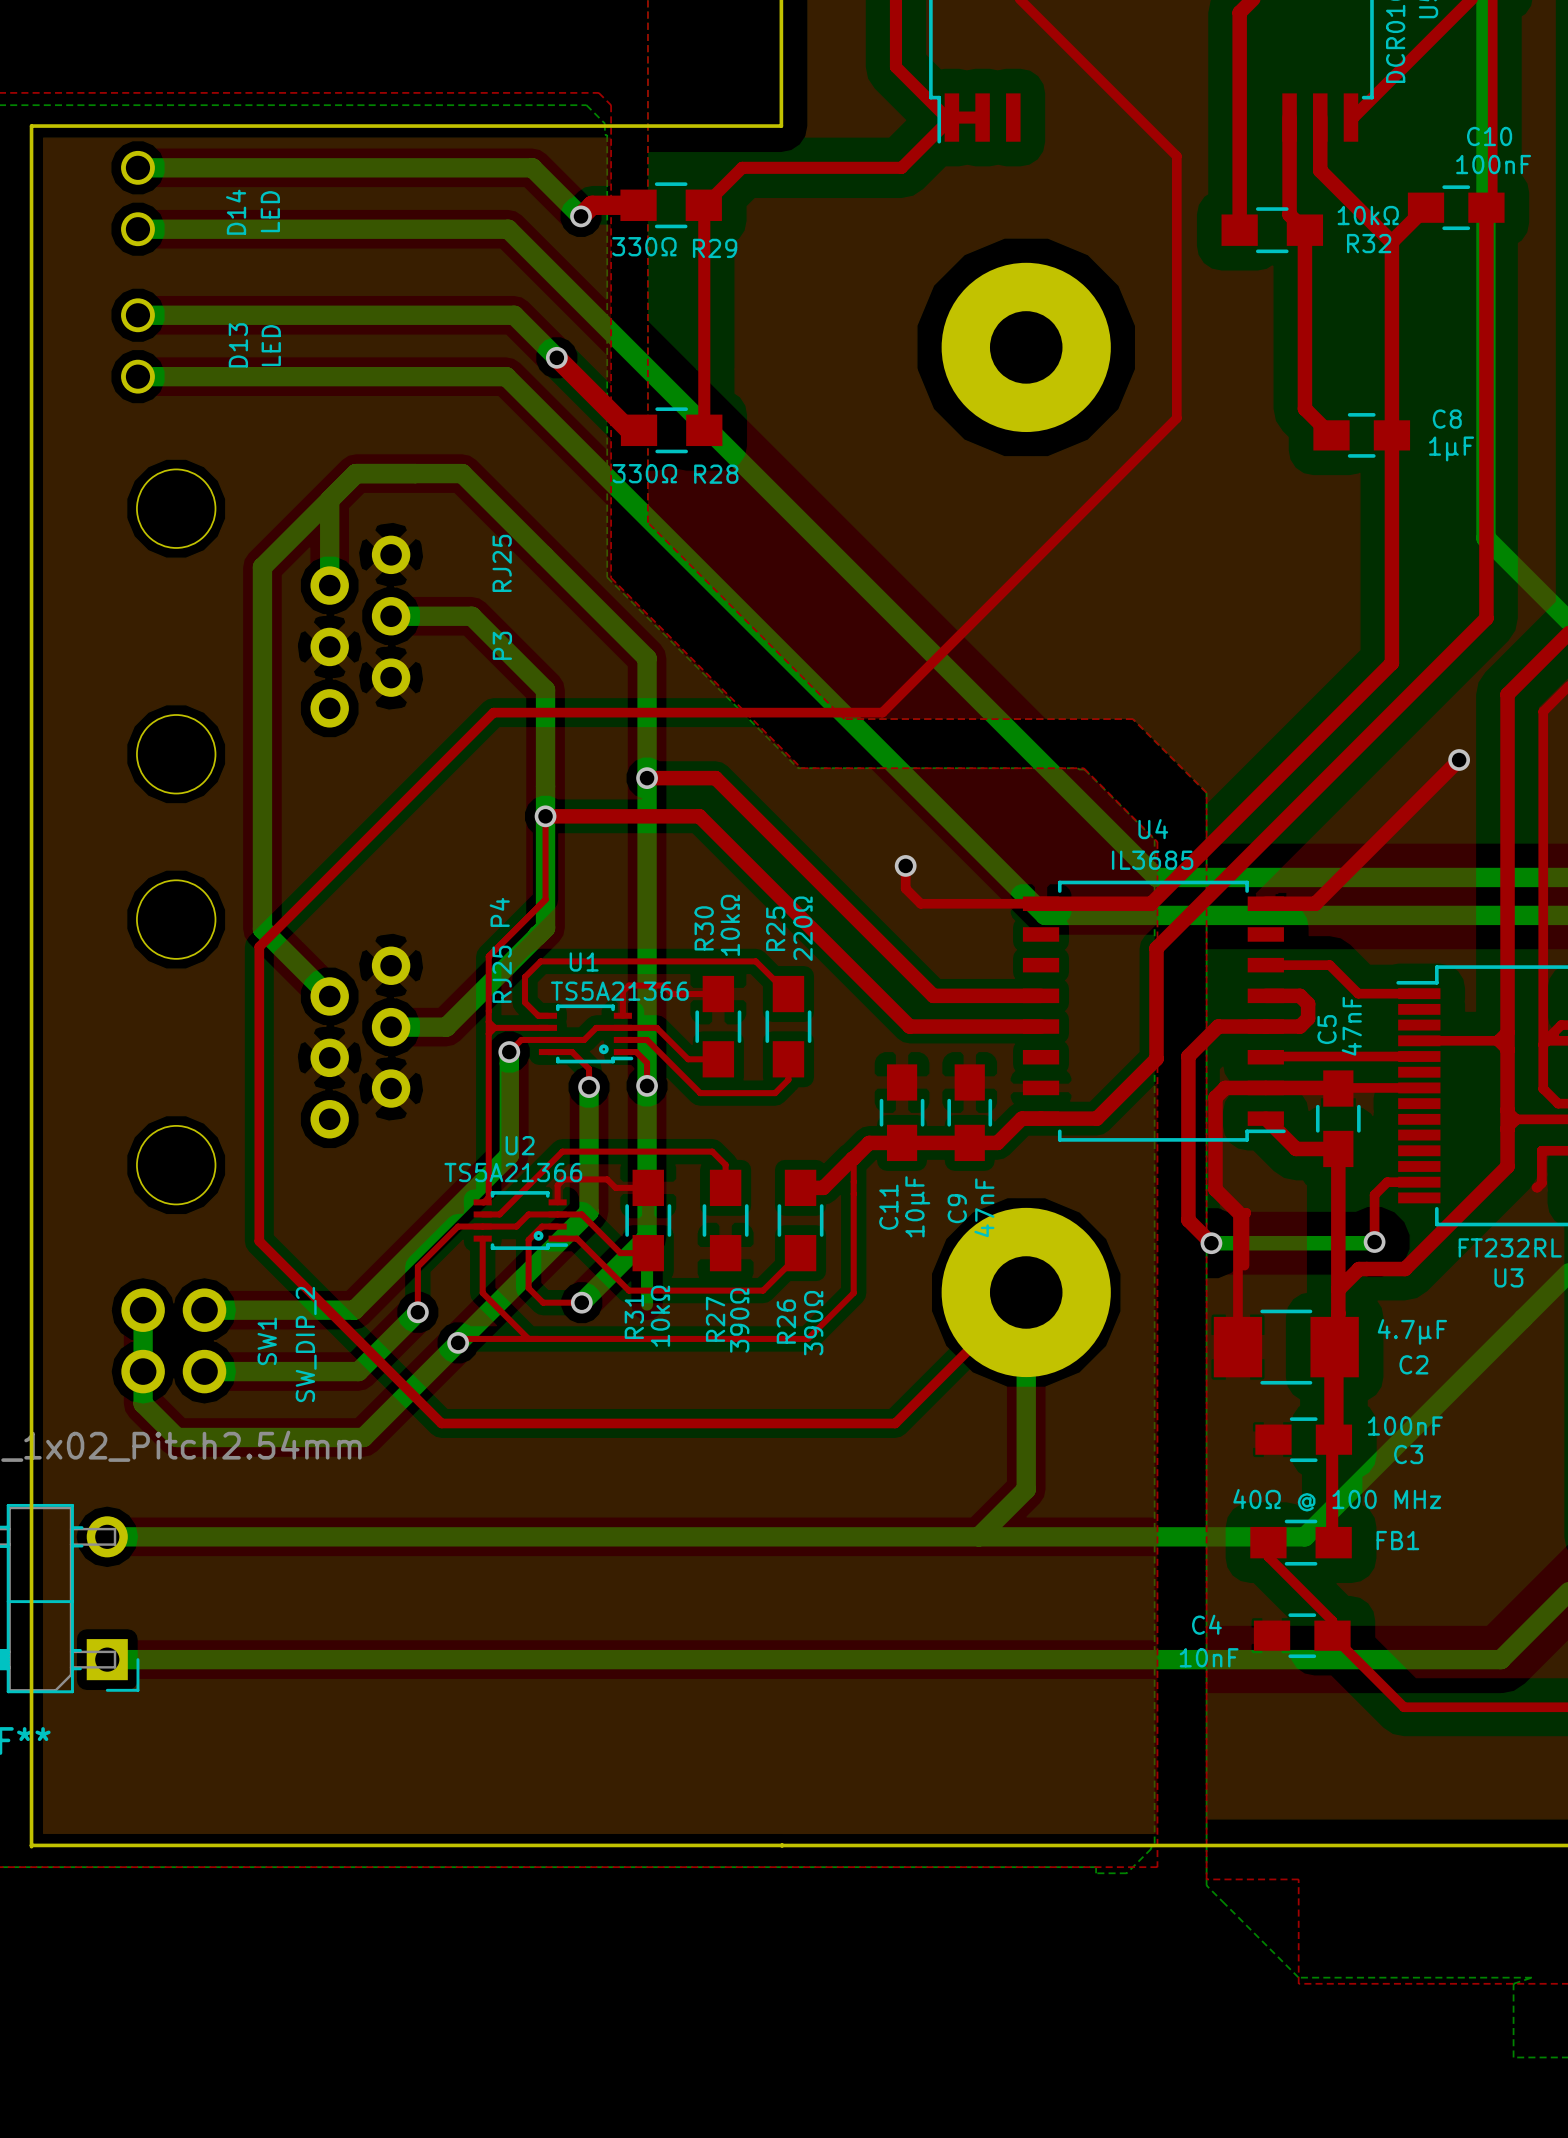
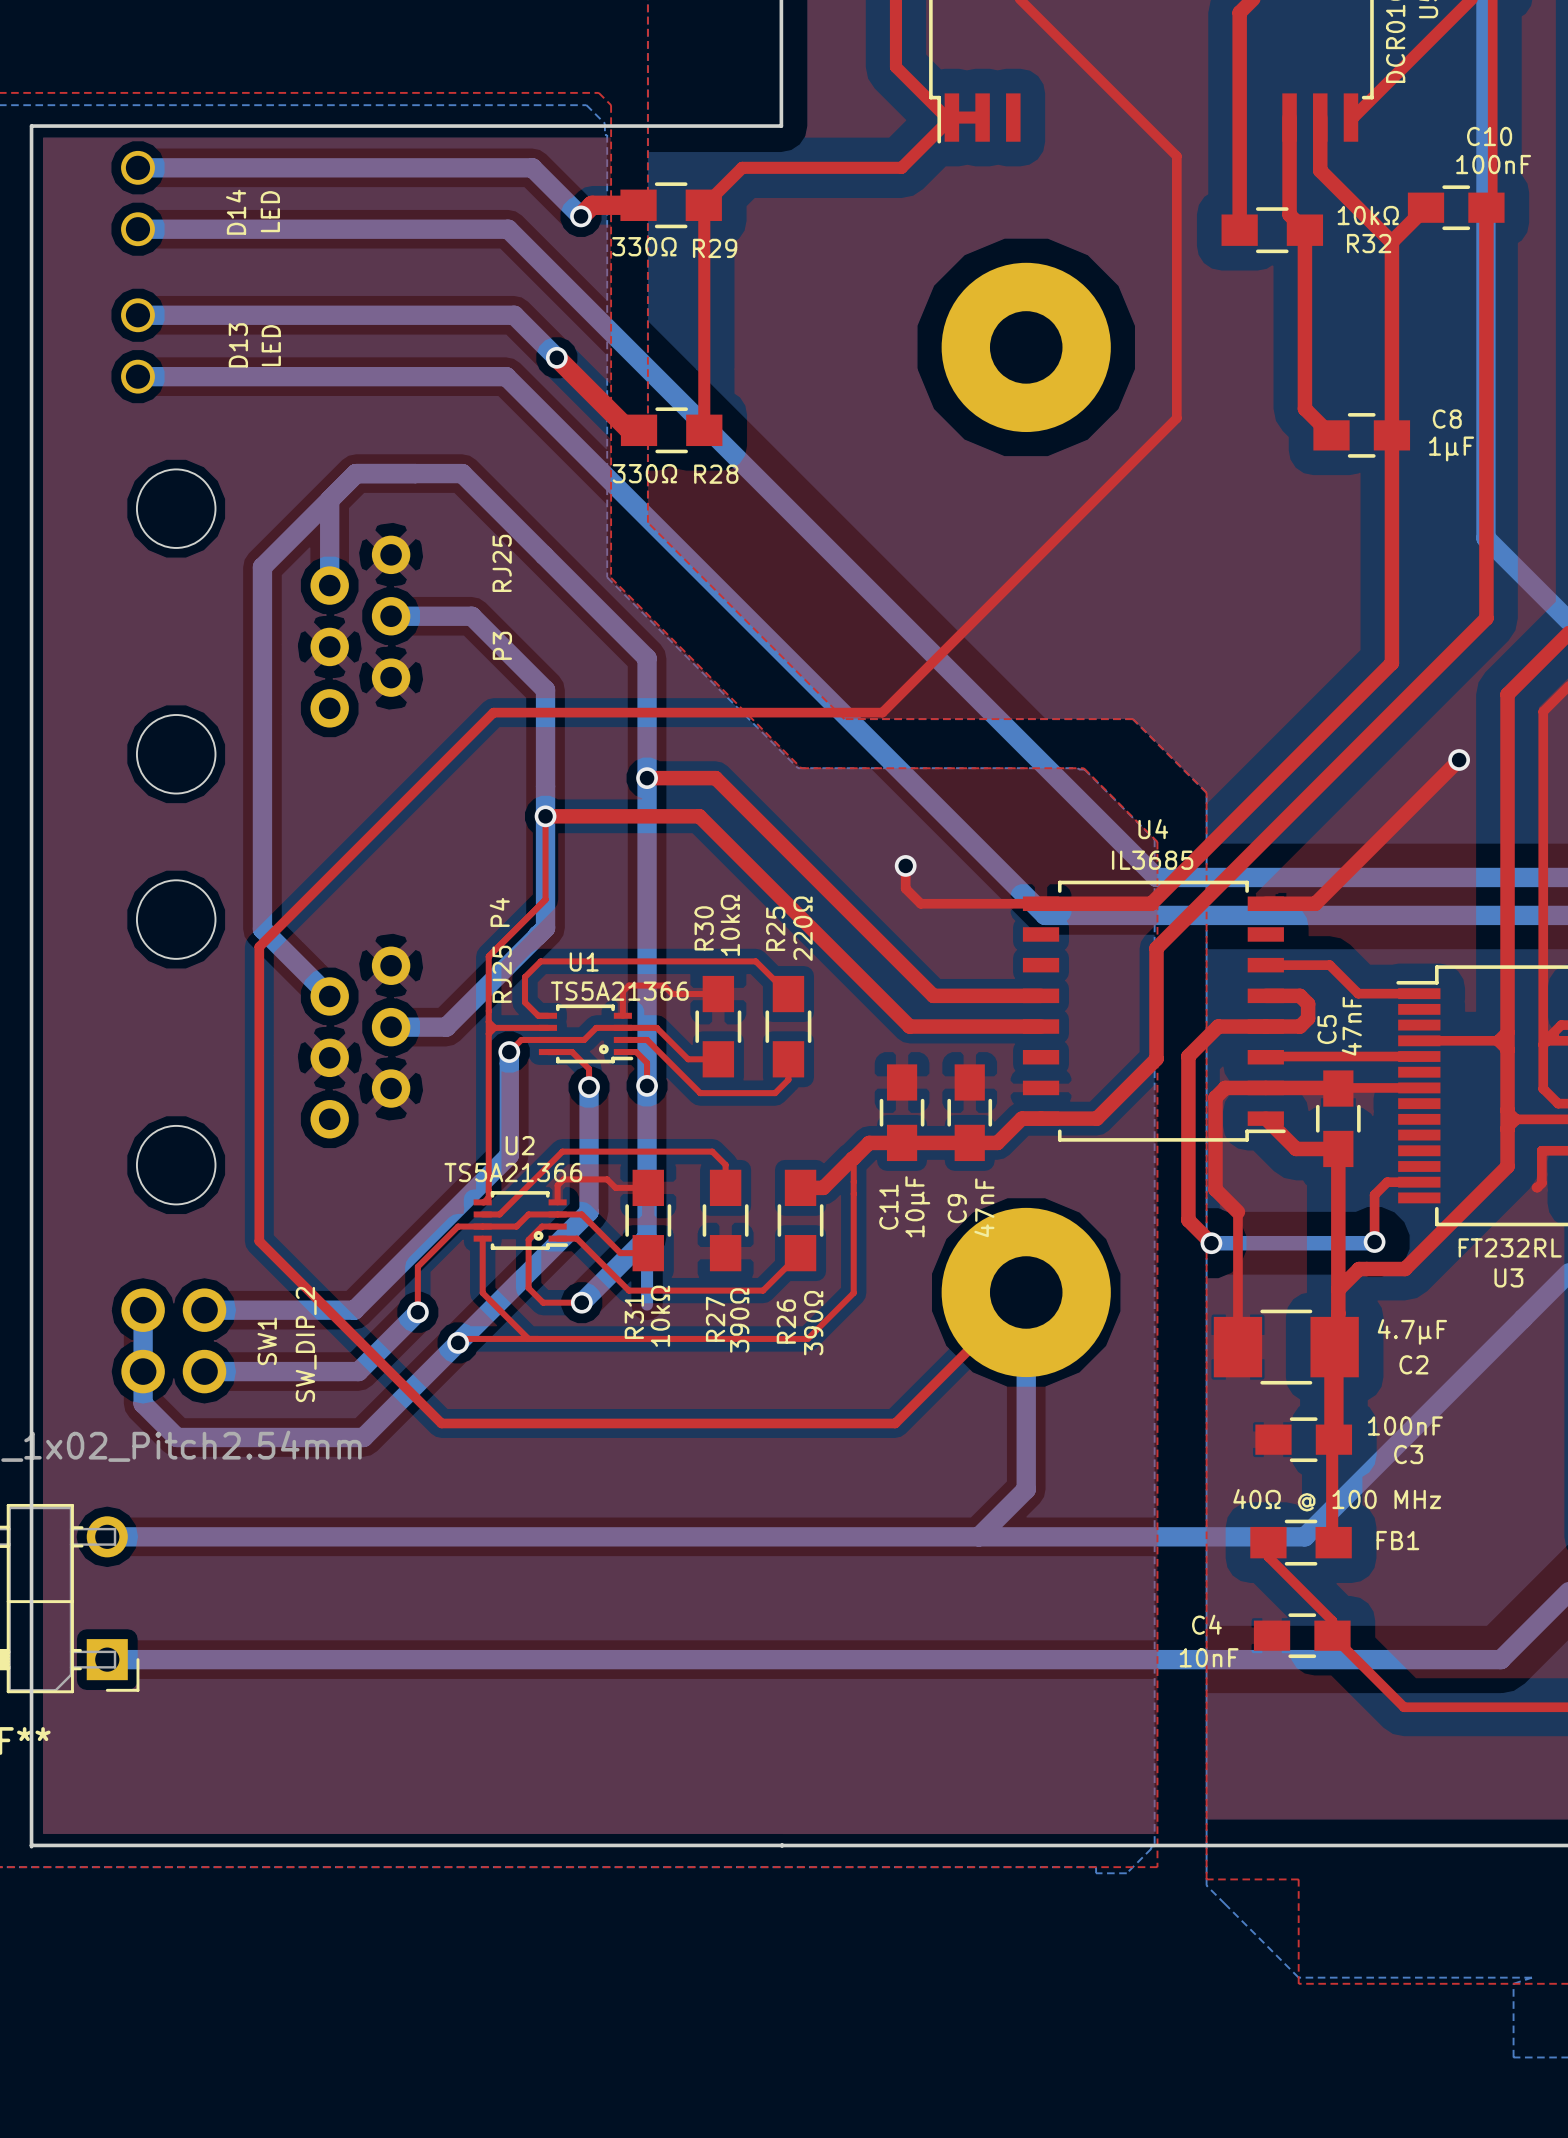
top track: (1246, 1212) (1244, 1214) (1244, 1265) -> none

